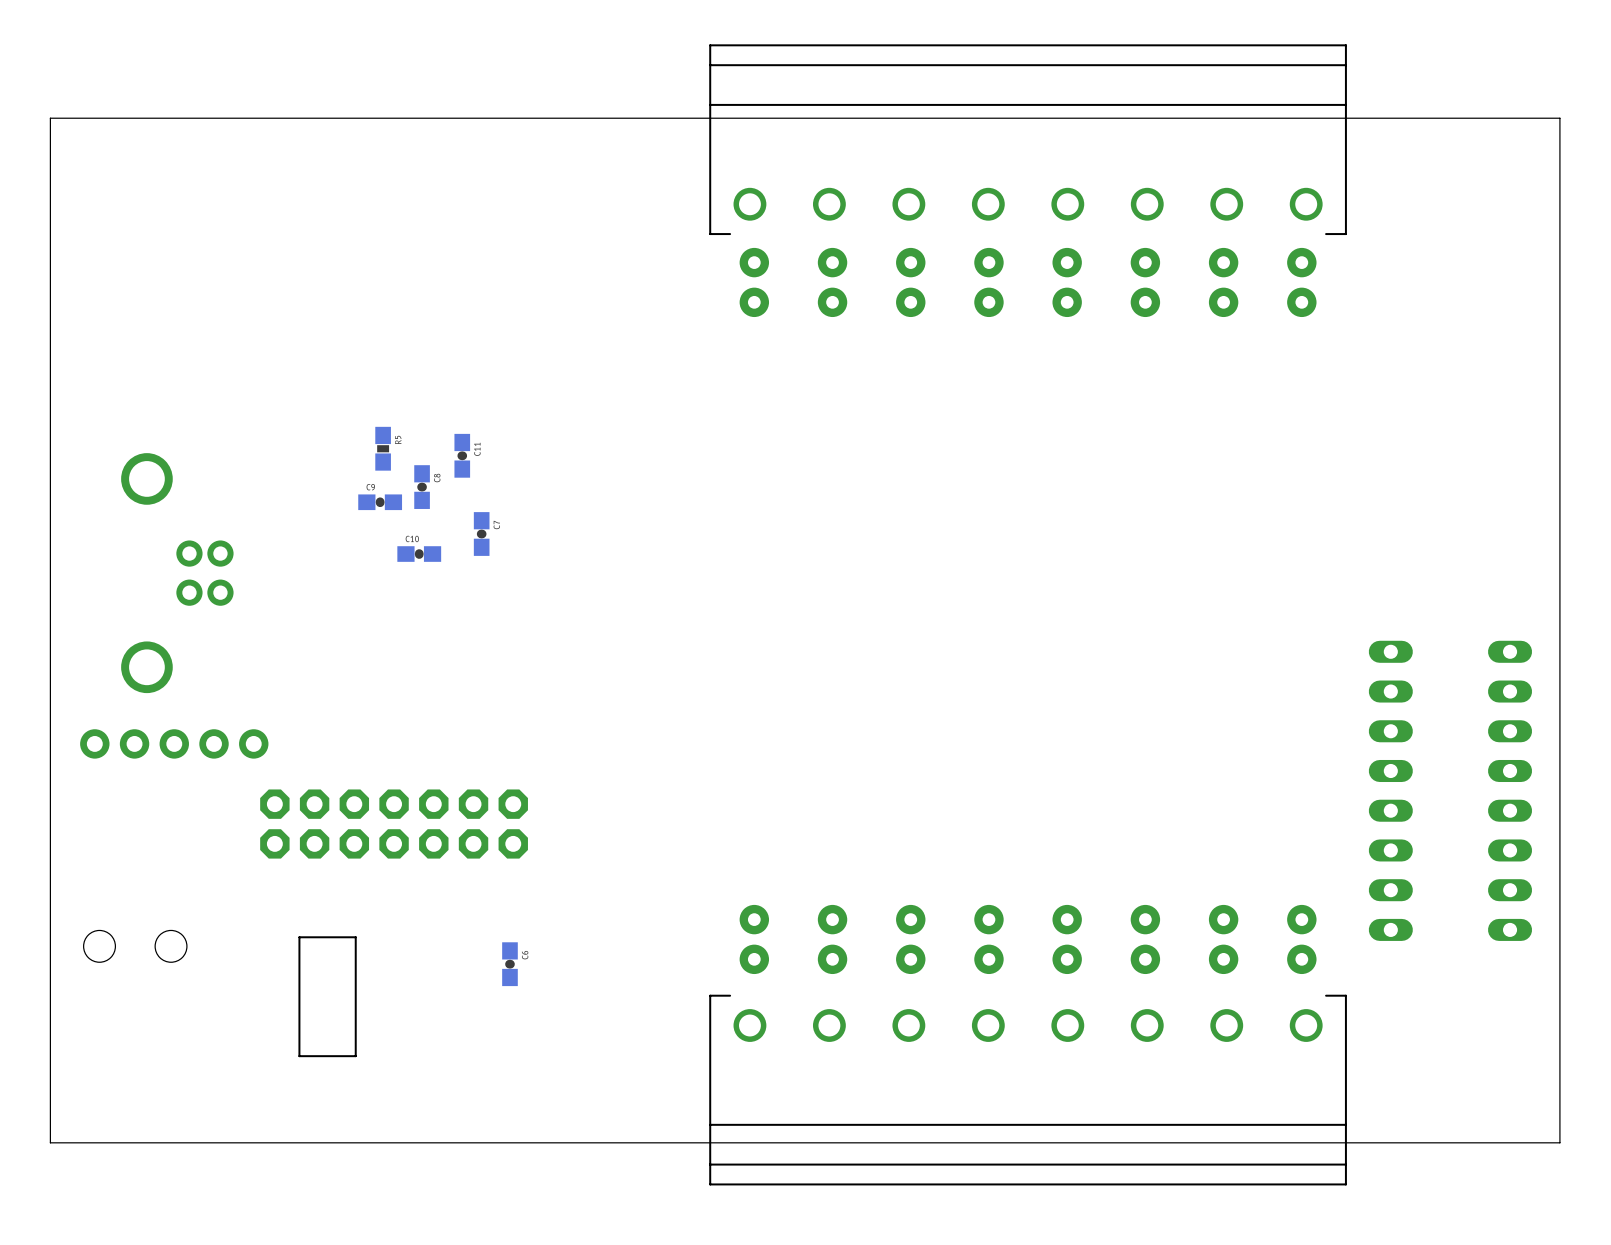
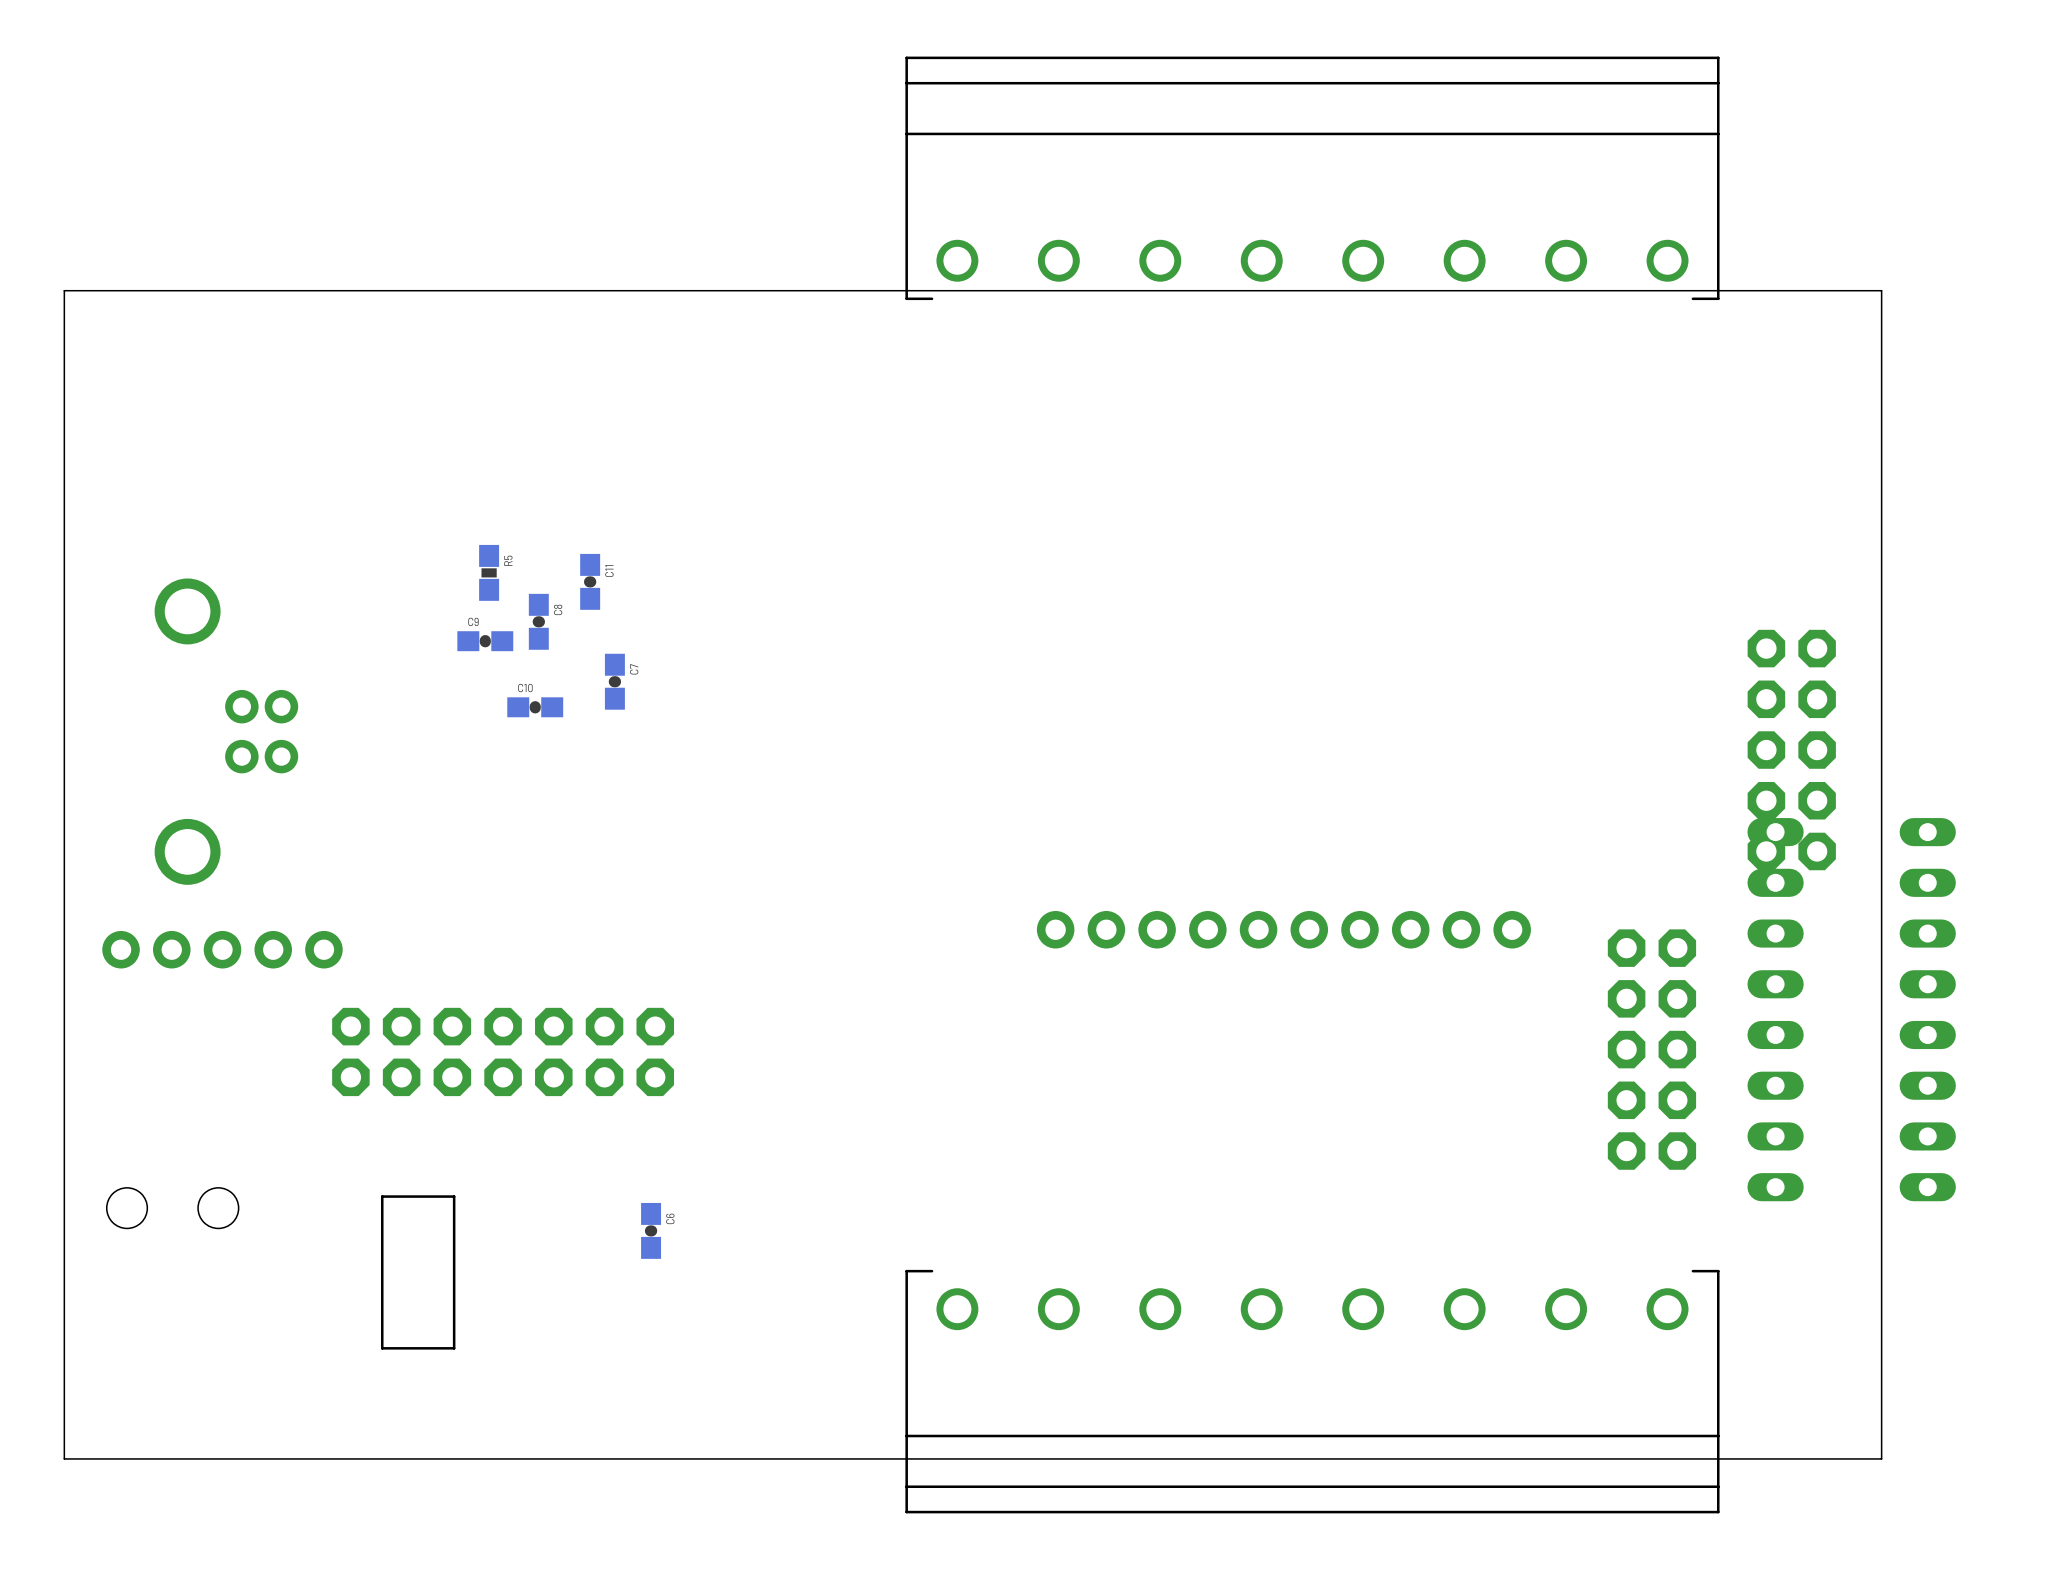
board edge: (50, 227) (50, 118) (1559, 118) (1559, 1142) (1473, 1142) -> (64, 290) (1881, 290) (1881, 1458)
part: (754, 282) -> none
part: (832, 282) -> none
part: (910, 282) -> none
part: (988, 282) -> none
part: (1067, 282) -> none
part: (1145, 282) -> none
part: (1223, 282) -> none
part: (1301, 282) -> none
part: none -> (1791, 750)
part: none -> (1283, 929)
part: none -> (1651, 1049)
part: (754, 939) -> none
part: (832, 939) -> none
part: (910, 939) -> none
part: (988, 939) -> none
part: (1067, 939) -> none
part: (1145, 939) -> none
part: (1223, 939) -> none
part: (1301, 939) -> none

